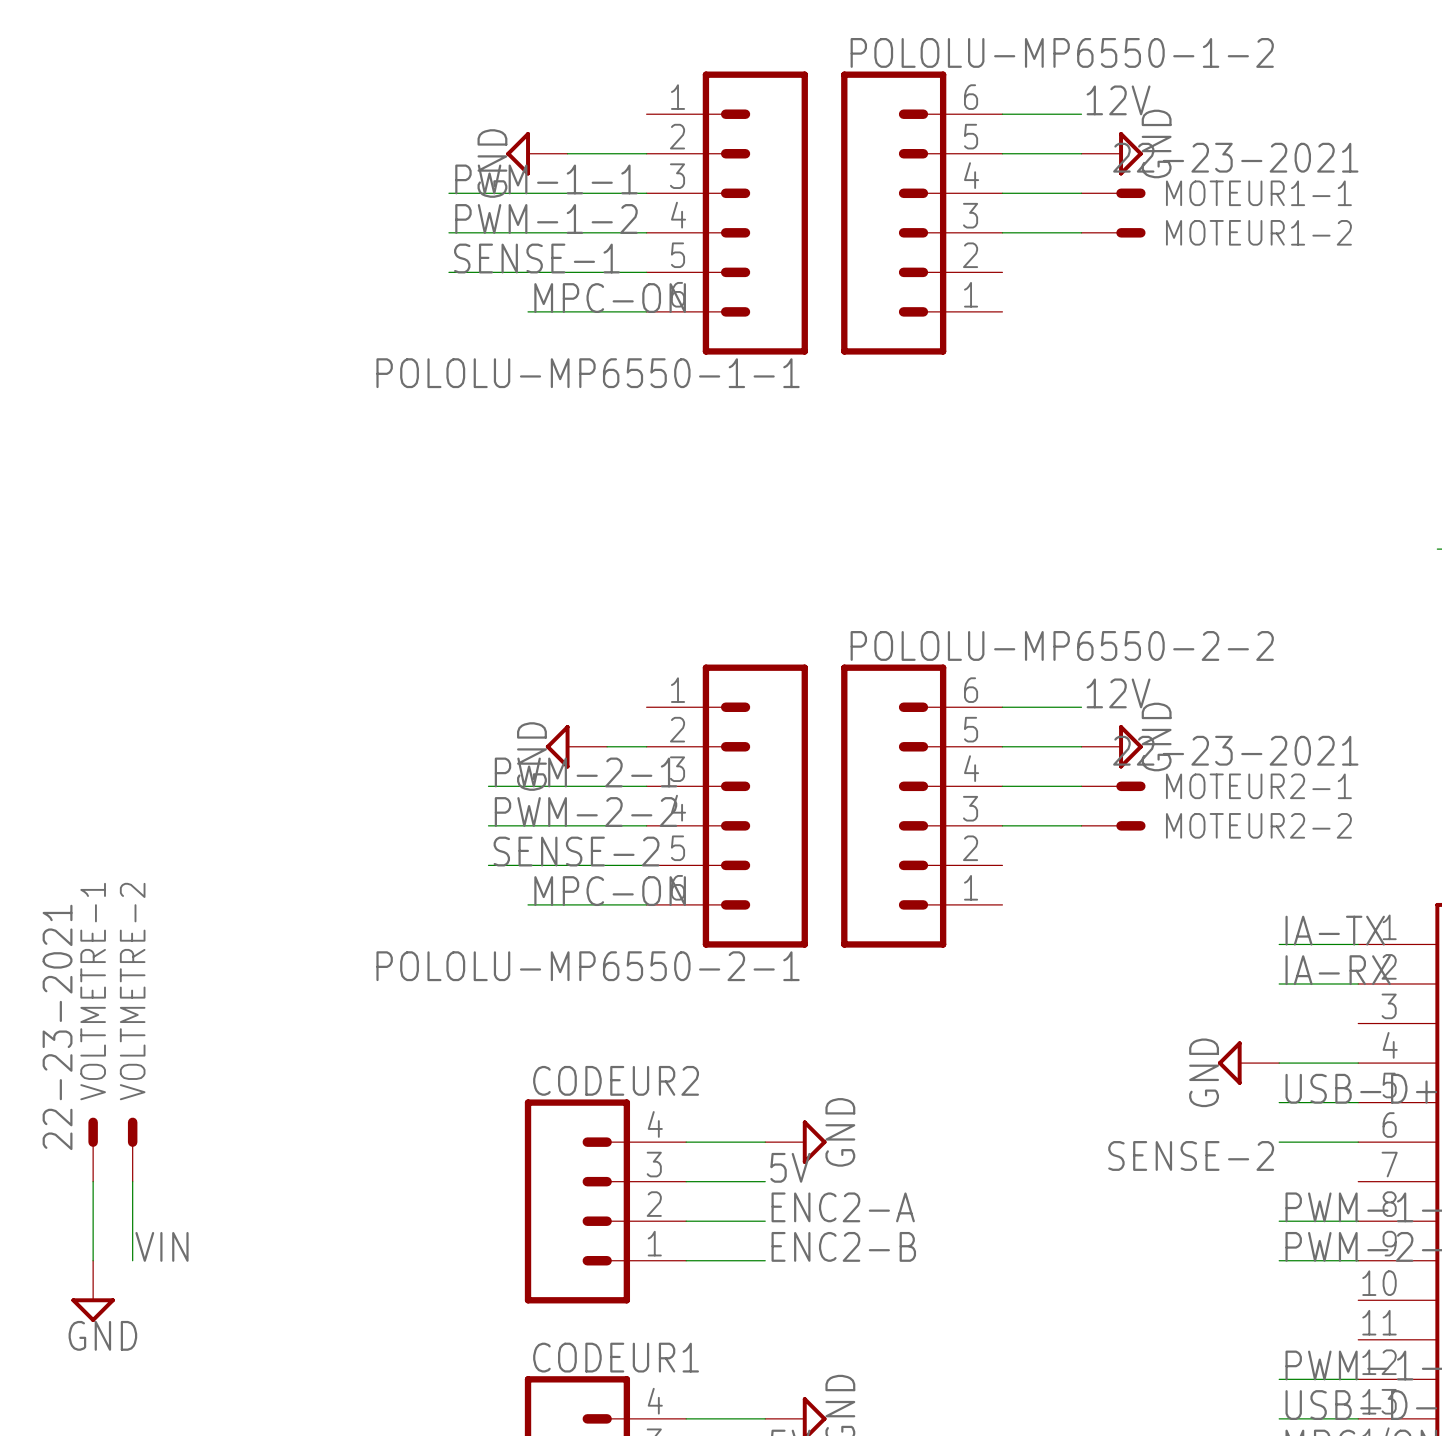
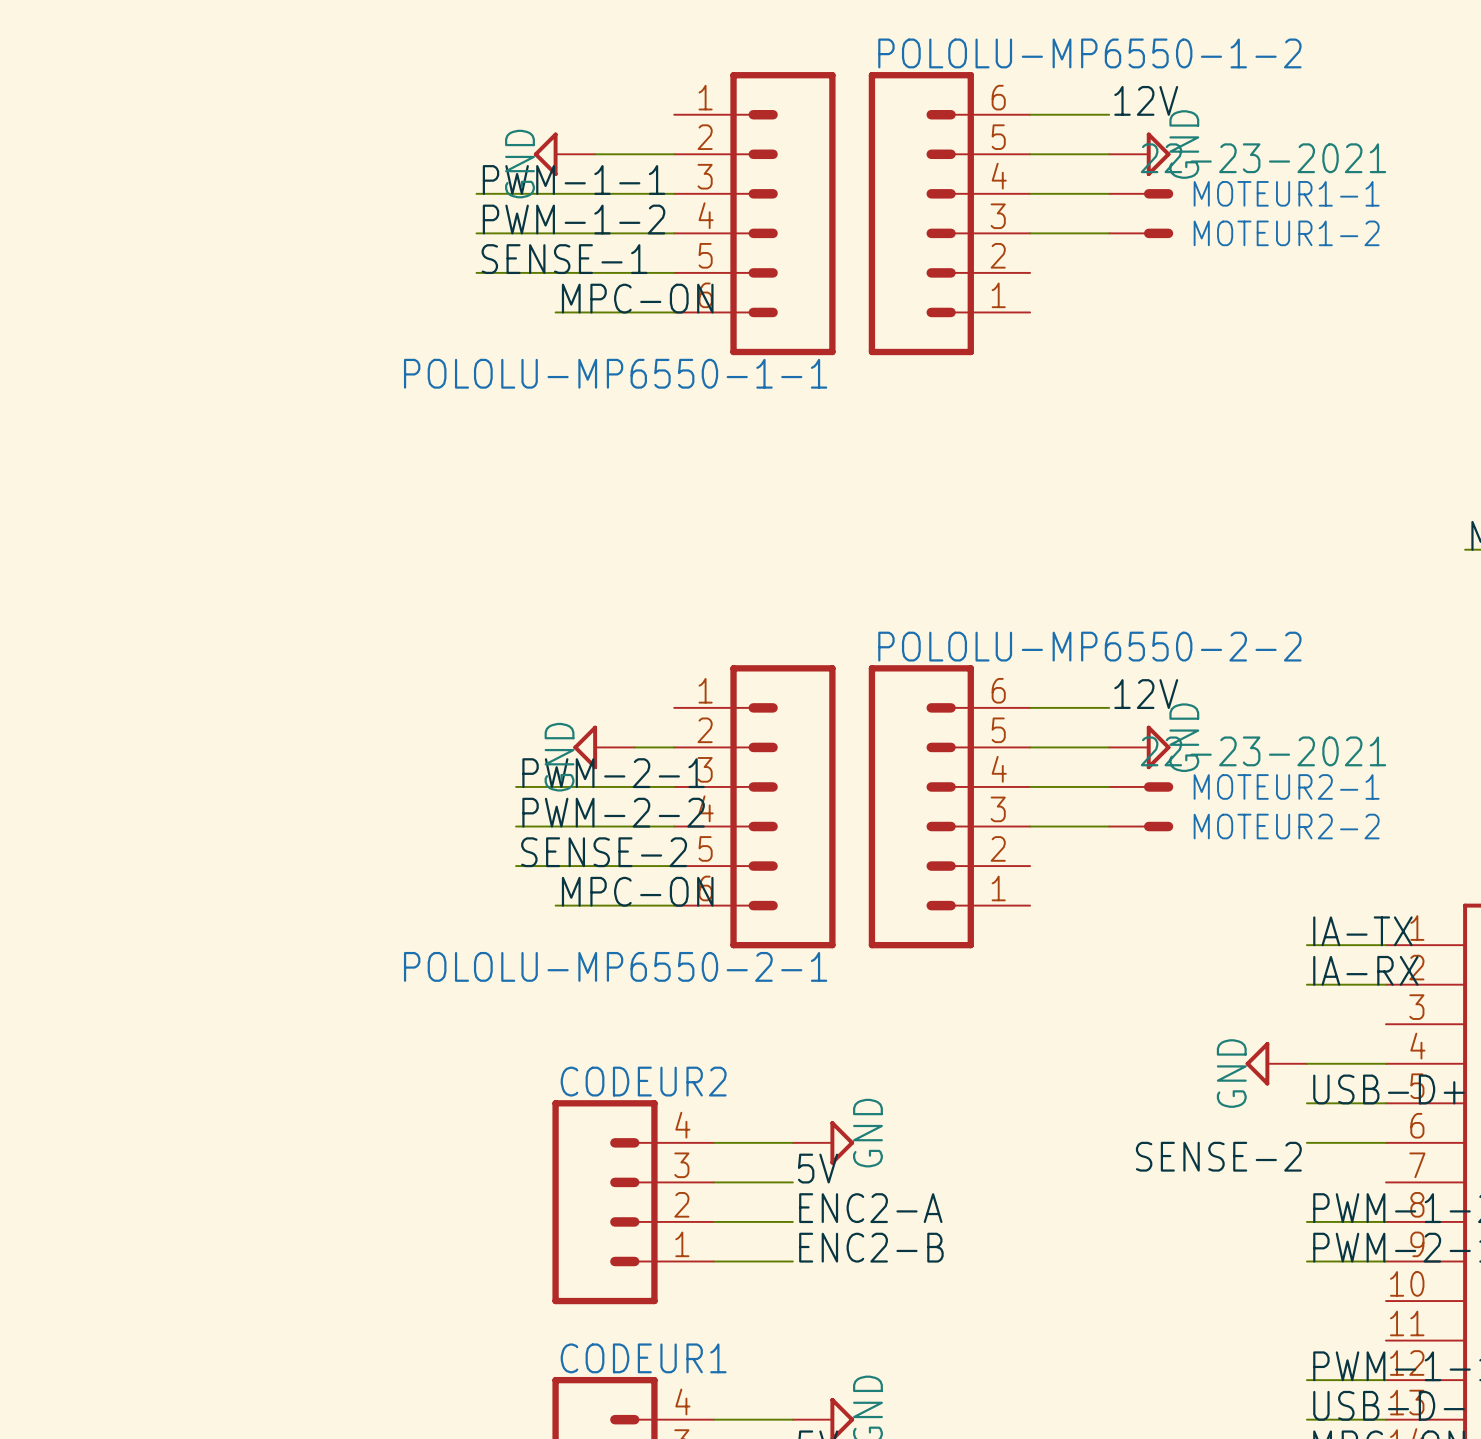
VOLTMETRE-1: 22-23-2021 (93, 1149) -> none
VOLTMETRE-2: (132, 1149) -> none
wire: (93, 1181) (93, 1260) -> none
wire: (132, 1181) (132, 1260) -> none
label: VIN (161, 1246) -> none
power symbol: GND (93, 1291) -> none

